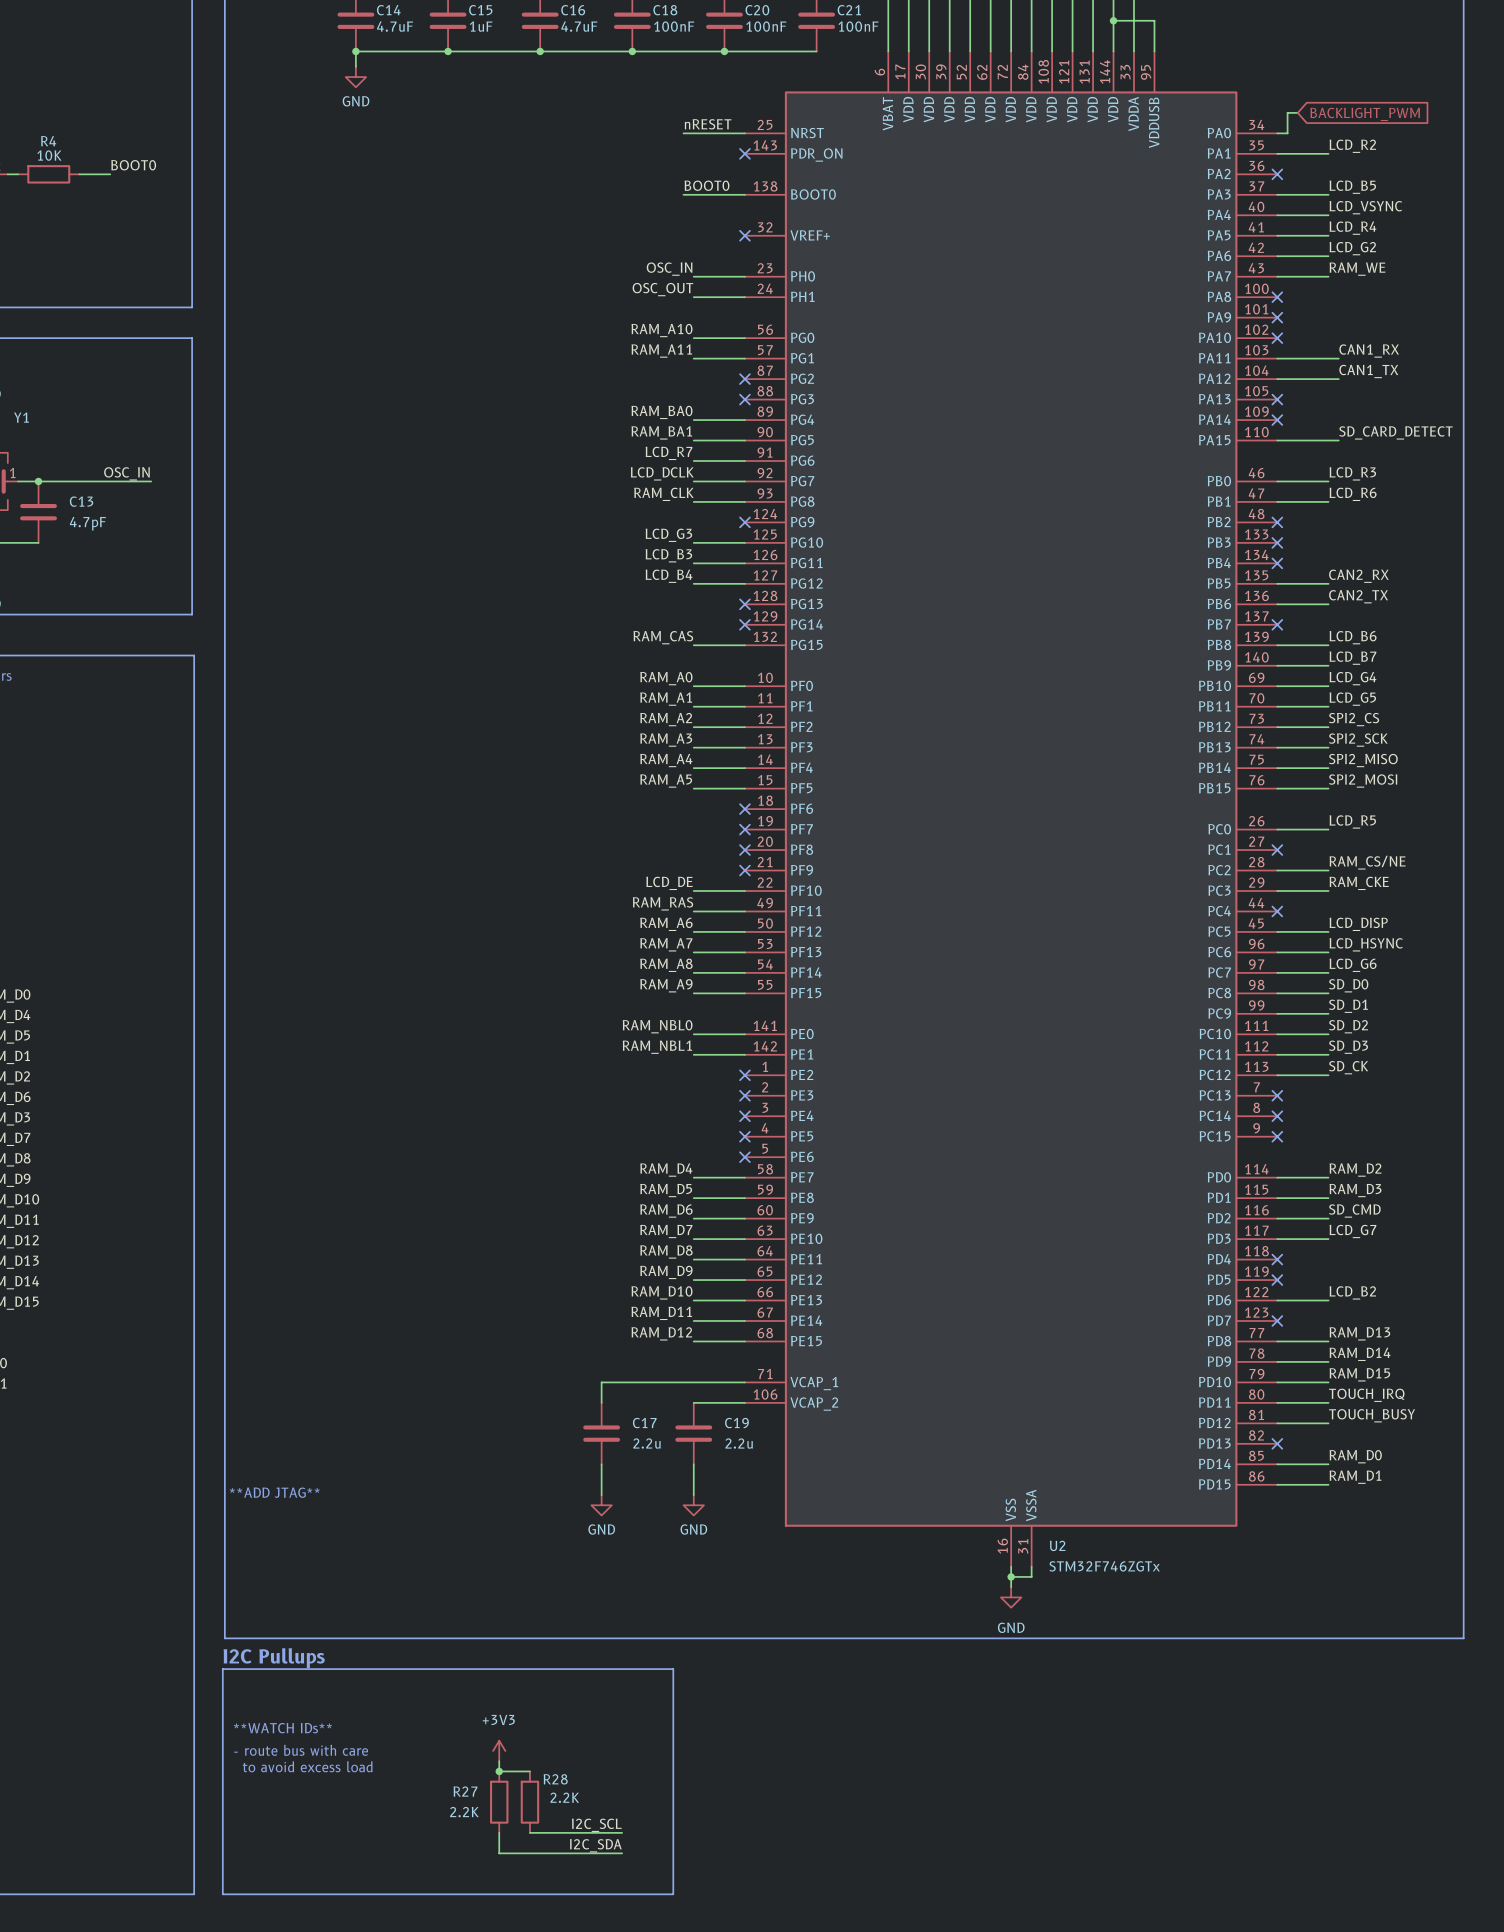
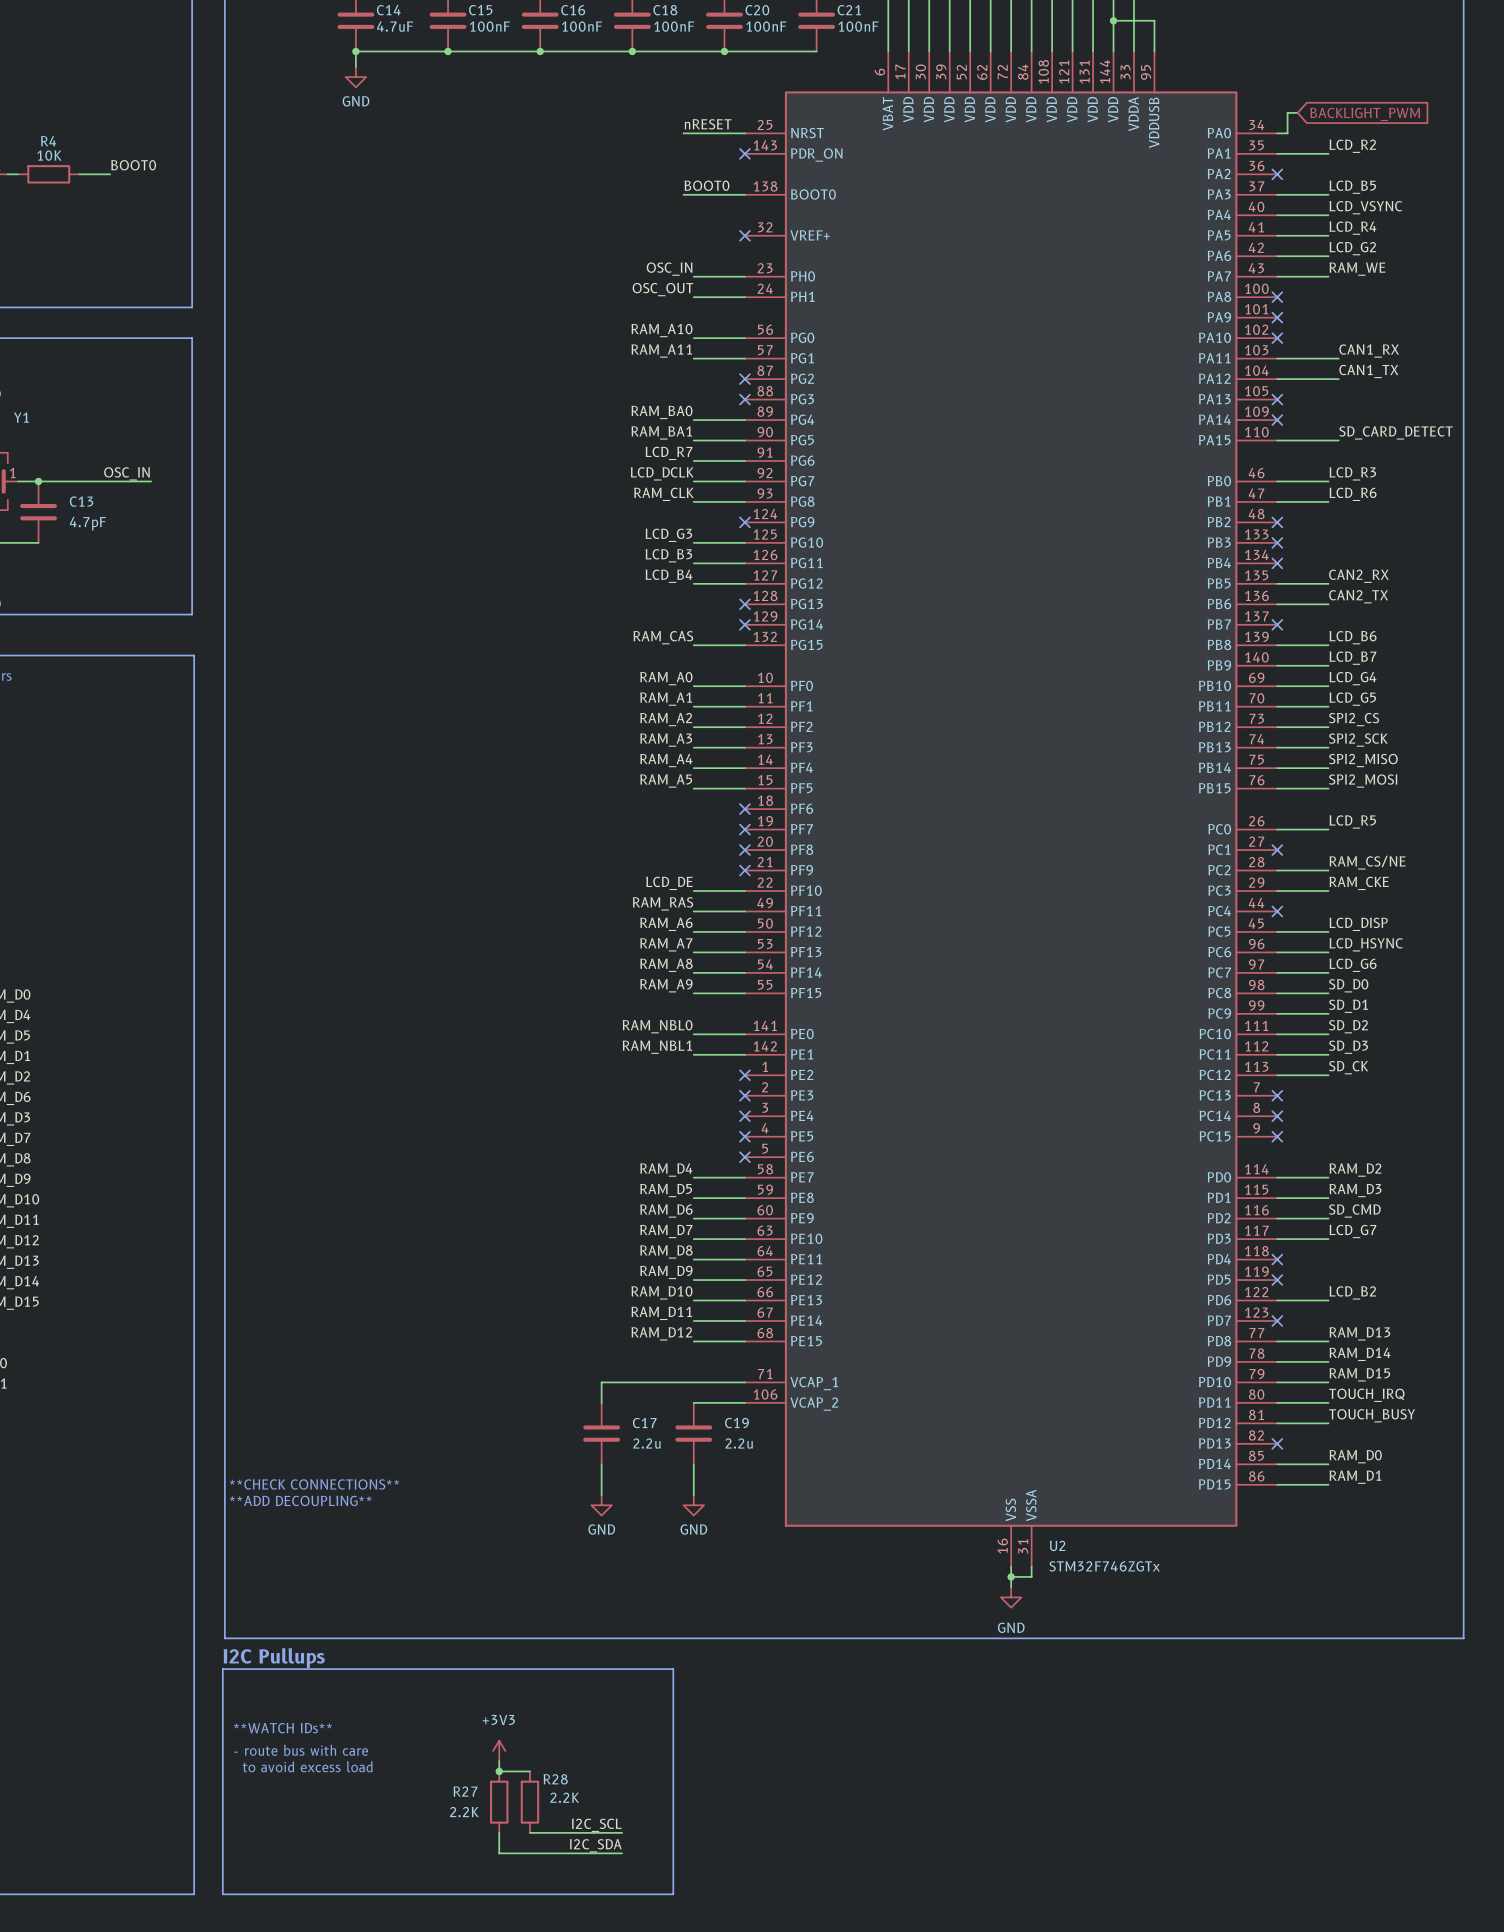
C15 value: 1uF (481, 26) -> 100nF (489, 26)
C16 value: 4.7uF (579, 26) -> 100nF (582, 26)
text: none -> **CHECK CONNECTIONS** (314, 1484)
text: **ADD JTAG** (274, 1492) -> none
text: none -> **ADD DECOUPLING** (300, 1500)

